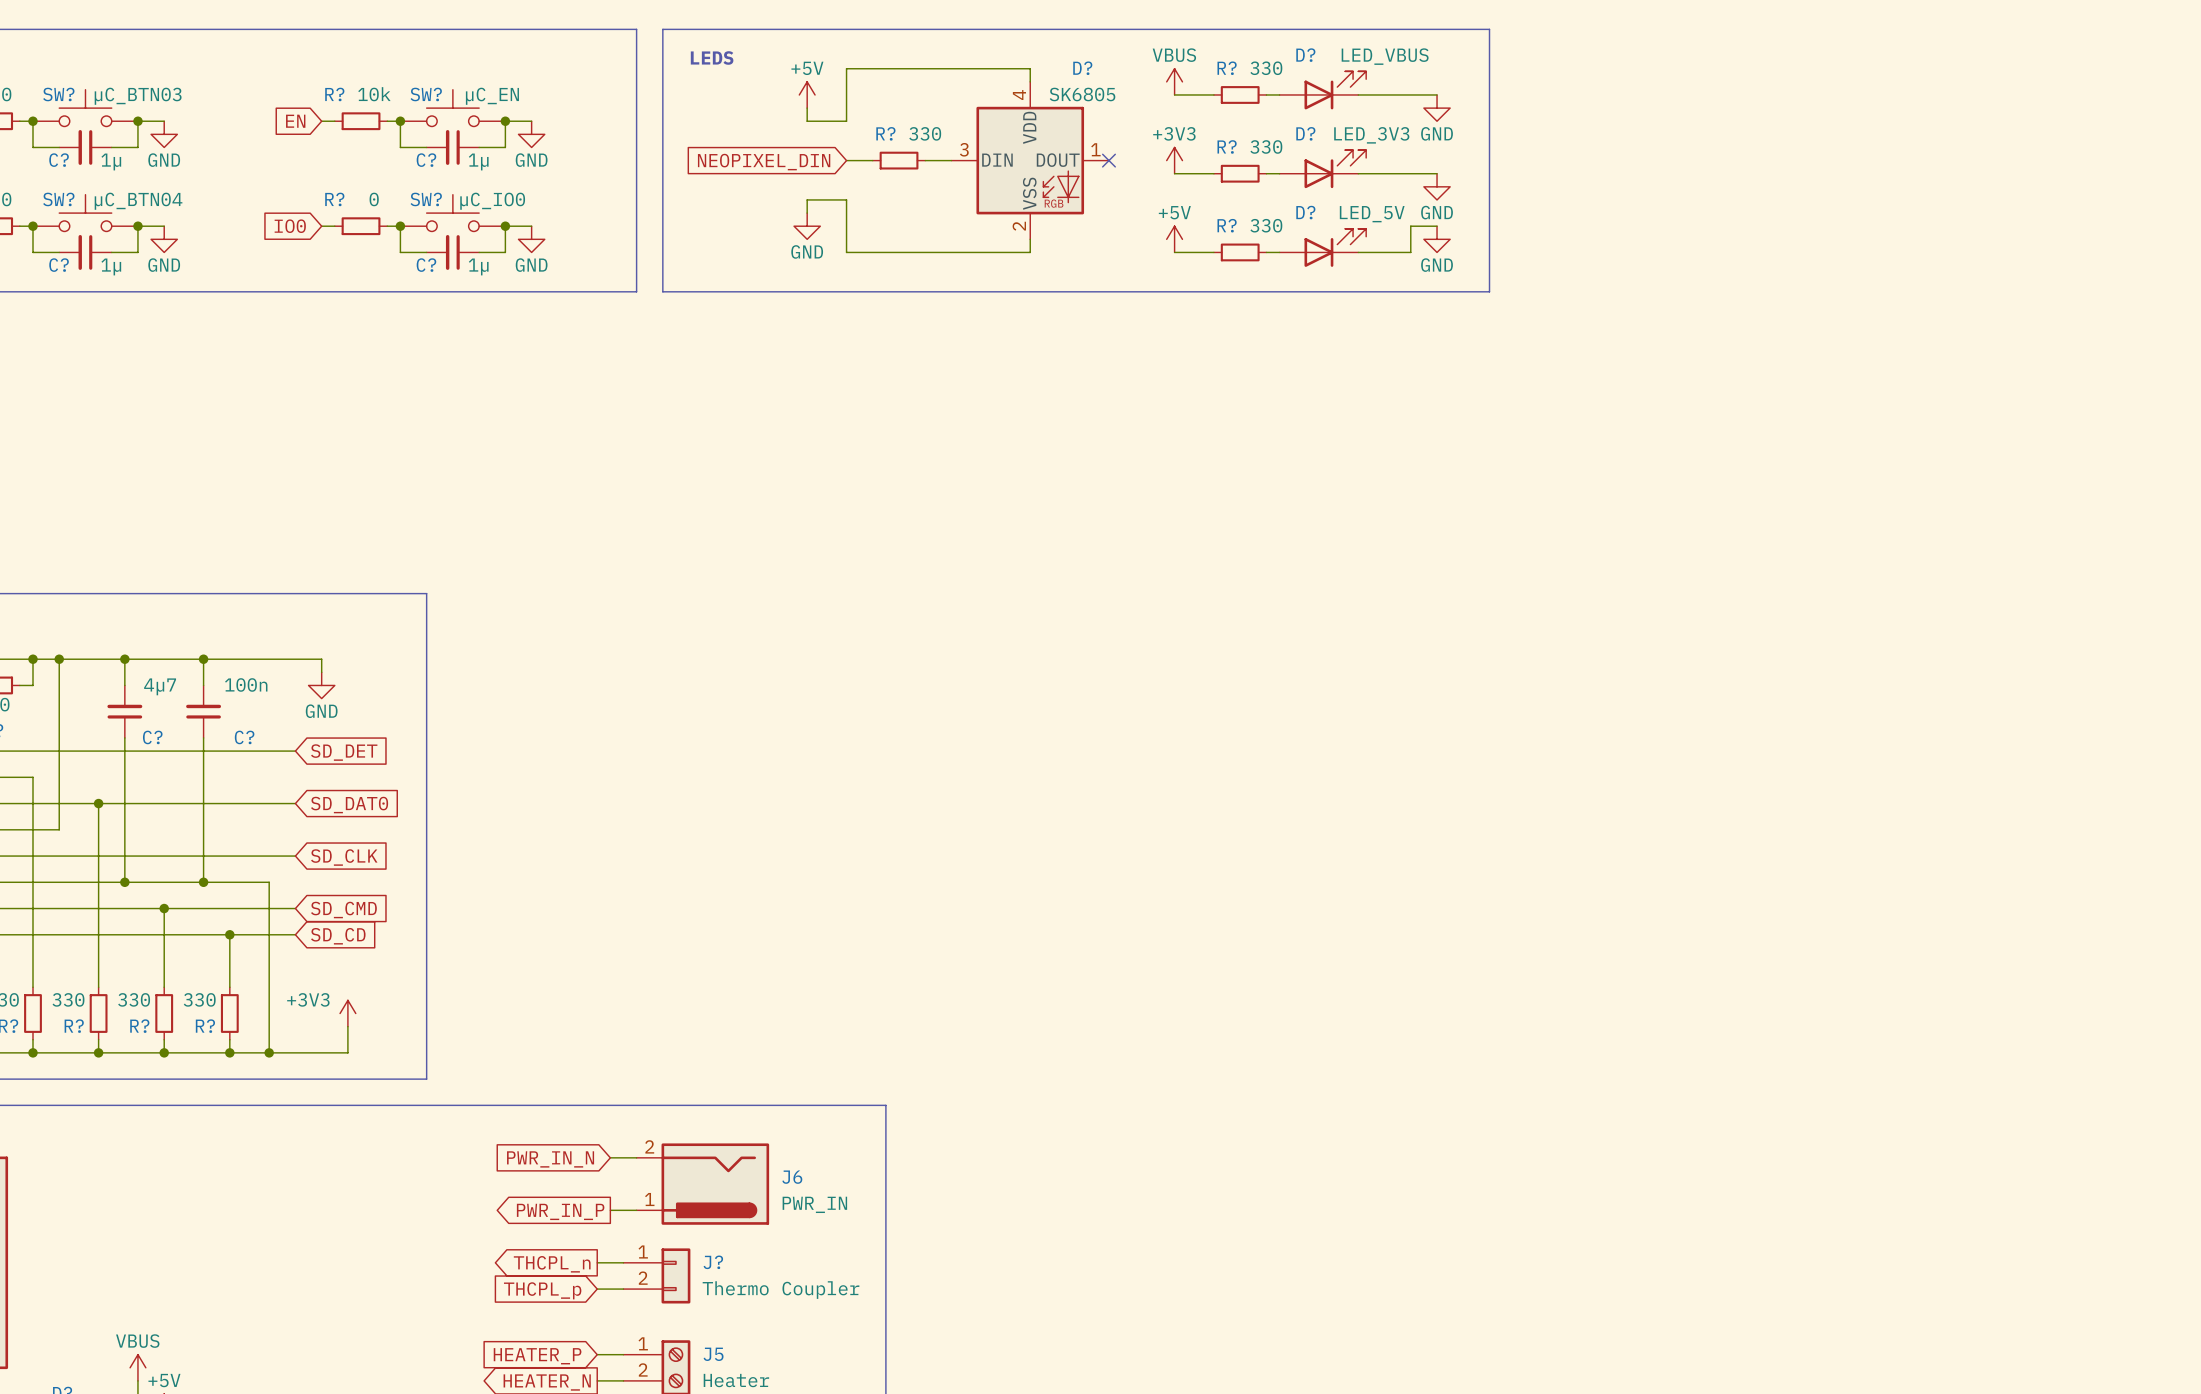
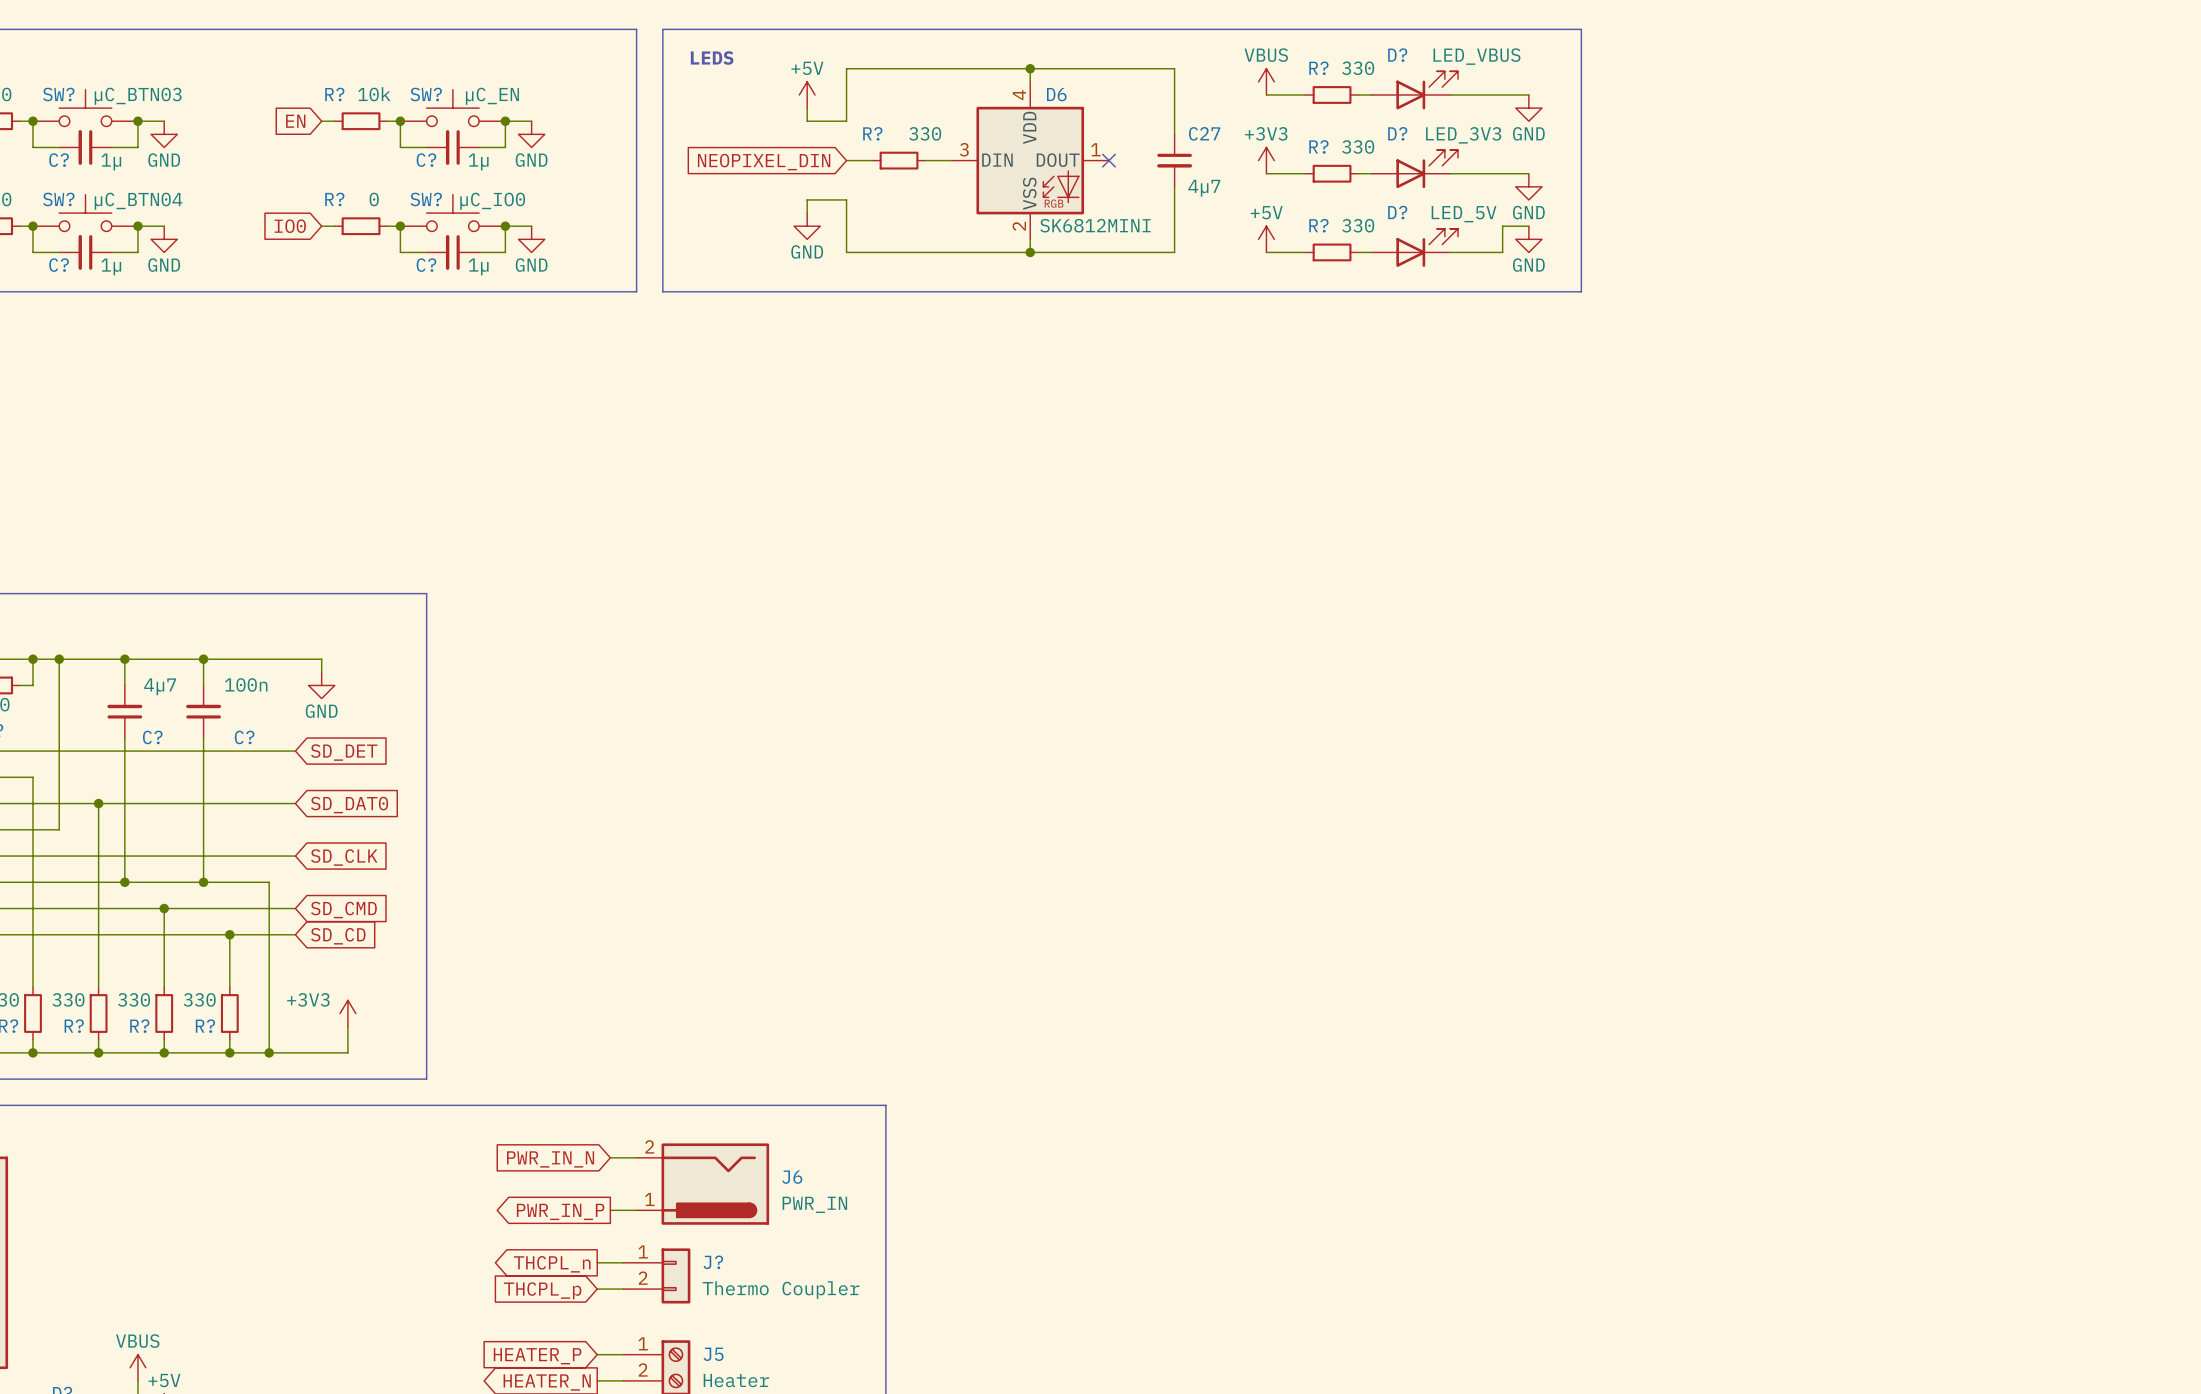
line: (1489, 29) (1489, 291) -> (1489, 29) (1581, 29) (1581, 291) (1489, 291)
wire: none -> (1030, 68) (1174, 68) (1174, 134)
junction: none -> (1030, 68)
D? name: D? (1082, 68) -> D6 (1056, 94)
power symbol position: VBUS (1174, 81) -> VBUS (1266, 81)
D? position: (1322, 90) -> (1414, 90)
D? value: SK6805 (1082, 94) -> SK6812MINI (1095, 225)
wire: (1174, 94) (1213, 94) -> none
R?: 330 (1240, 94) -> none
R?: none -> 330 (1332, 94)
wire: none -> (1450, 94) (1528, 94)
power symbol: GND (1437, 108) -> none
power symbol: none -> GND (1528, 108)
R? name position: R? (885, 133) -> R? (872, 133)
power symbol position: +3V3 (1174, 160) -> +3V3 (1266, 160)
C27: none -> 4µ7 (1174, 160)
D? position: (1322, 169) -> (1414, 169)
wire: (1174, 173) (1213, 173) -> none
R?: 330 (1240, 173) -> none
R?: none -> 330 (1332, 173)
wire: none -> (1450, 173) (1528, 173)
wire: none -> (1174, 186) (1174, 252) (1030, 252)
power symbol: GND (1437, 186) -> none
power symbol: none -> GND (1528, 186)
wire: (1437, 226) (1410, 226) (1410, 252) (1371, 252) -> none
wire: none -> (1528, 226) (1502, 226) (1502, 252) (1450, 252)
power symbol position: +5V (1174, 239) -> +5V (1266, 239)
power symbol: GND (1437, 239) -> none
power symbol: none -> GND (1528, 239)
D? position: (1322, 247) -> (1414, 247)
junction: none -> (1030, 252)
wire: (1174, 252) (1213, 252) -> none
R?: 330 (1240, 252) -> none
R?: none -> 330 (1332, 252)

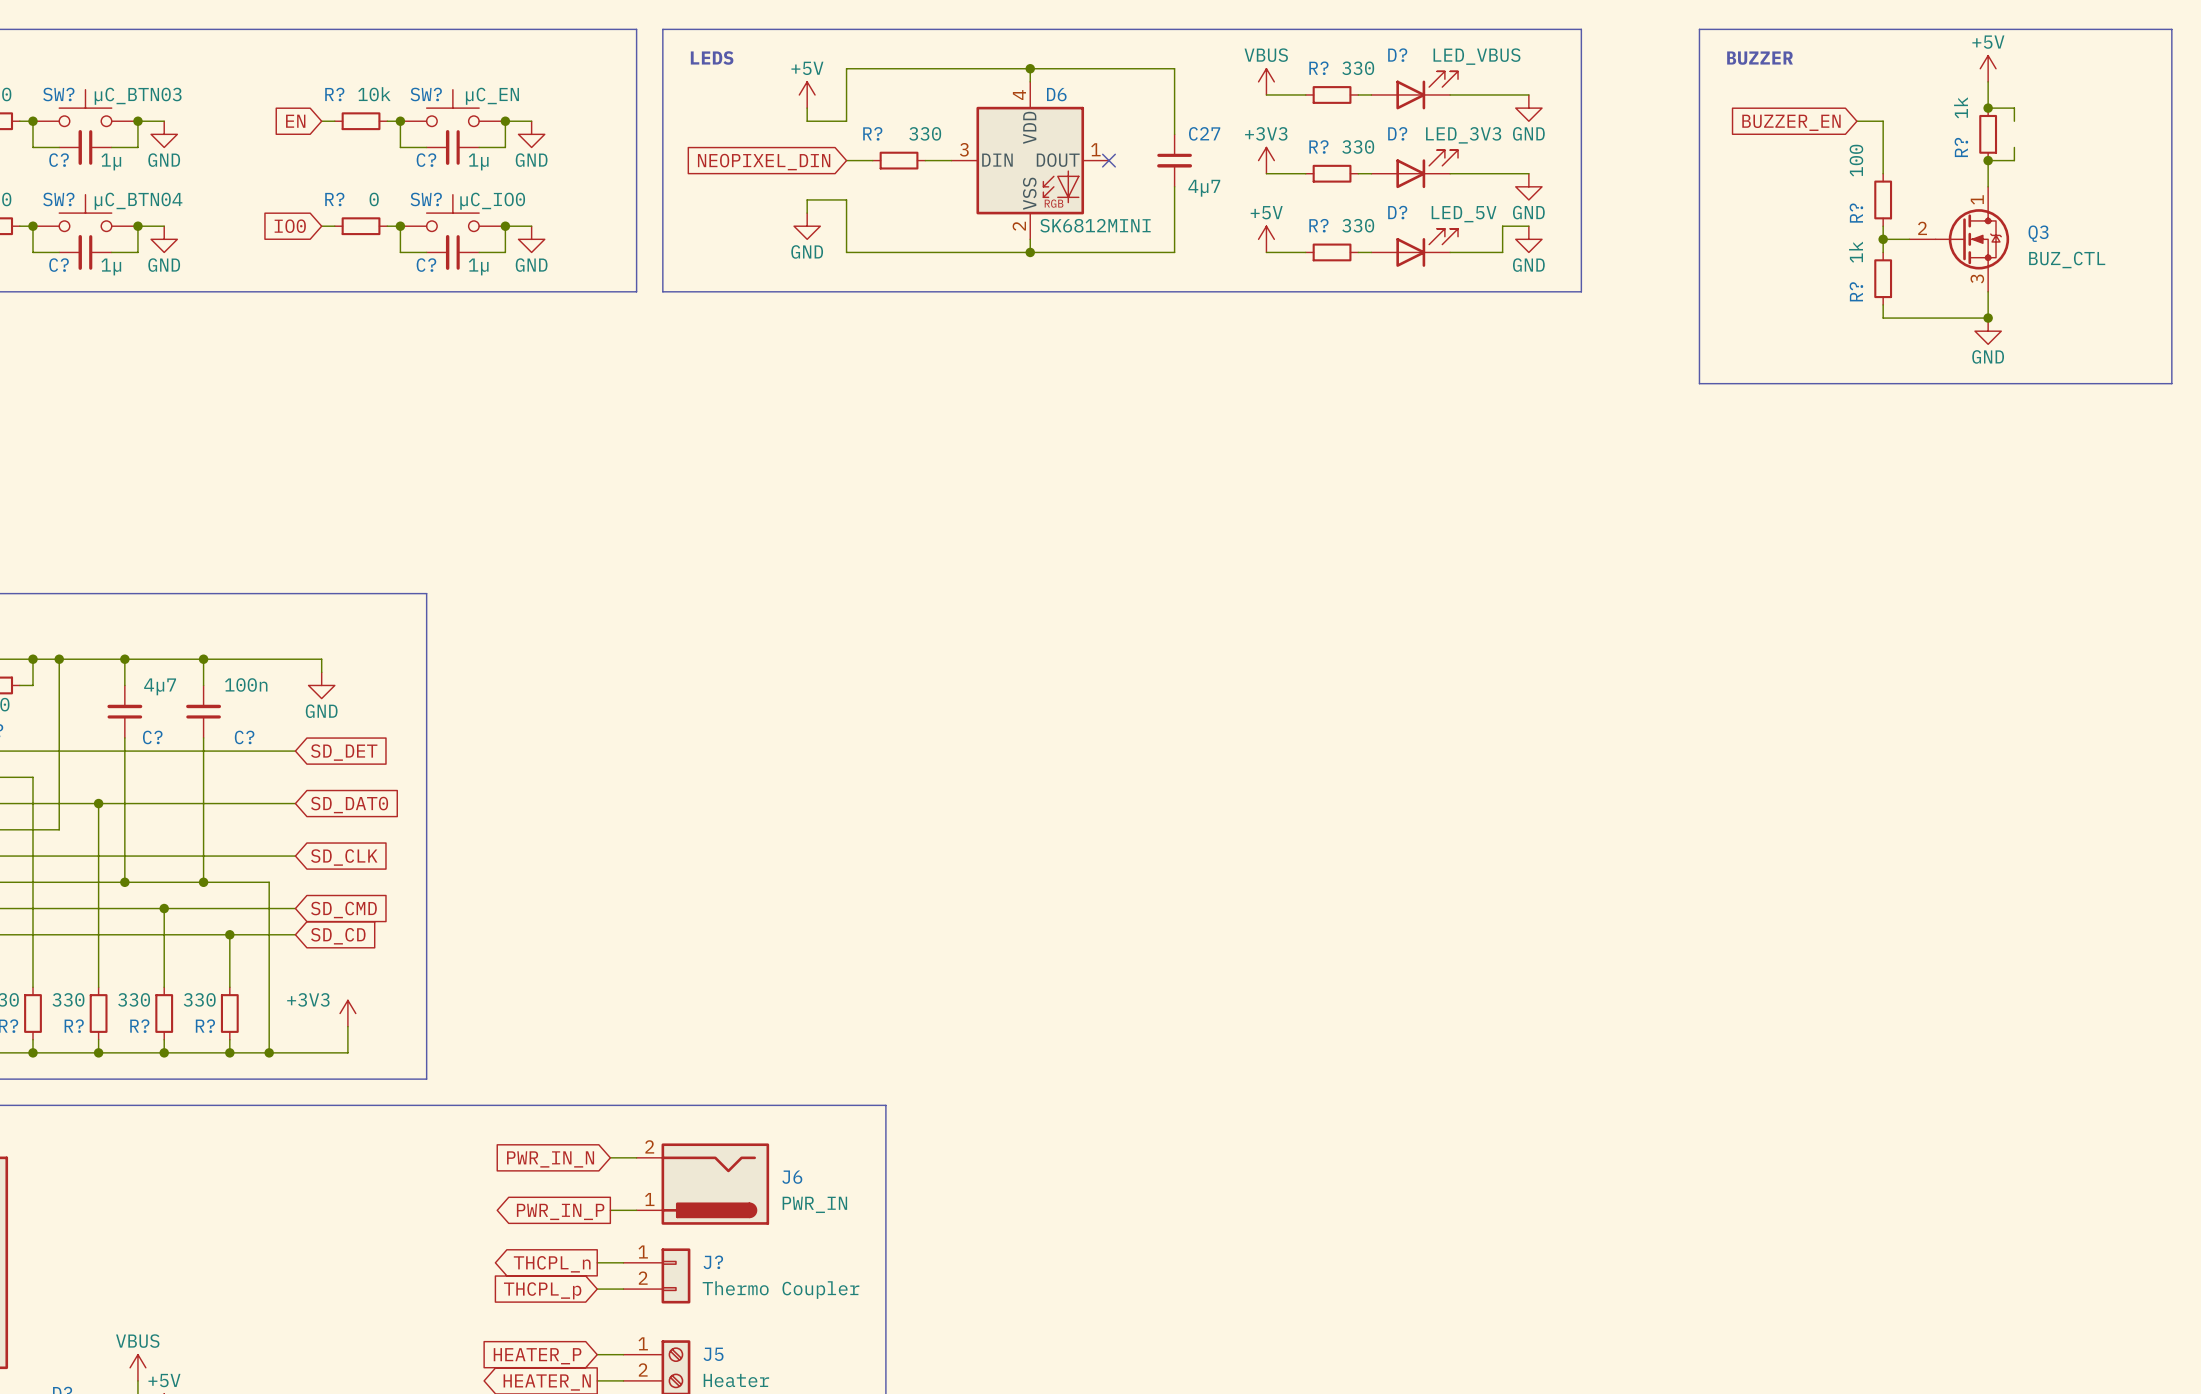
line: none -> (1699, 29) (1699, 383) (2171, 383) (2171, 29) (1699, 29)
text: none -> BUZZER (1760, 58)
power symbol: none -> +5V (1988, 68)
wire: none -> (1988, 81) (1988, 108) (2014, 108) (2014, 121)
junction: none -> (1988, 108)
wire: none -> (1856, 121) (1883, 121) (1883, 173)
global label: none -> BUZZER_EN (1791, 122)
R?: none -> 1k (1988, 134)
wire: none -> (2014, 147) (2014, 160) (1988, 160) (1988, 186)
junction: none -> (1988, 160)
R?: none -> 100 (1883, 199)
wire: none -> (1883, 226) (1883, 252)
wire: none -> (1883, 239) (1909, 239)
junction: none -> (1883, 239)
Q3: none -> BUZ_CTL (1959, 239)
R?: none -> 1k (1883, 278)
wire: none -> (1988, 291) (1988, 318) (1883, 318) (1883, 304)
junction: none -> (1988, 318)
power symbol: none -> GND (1988, 331)

